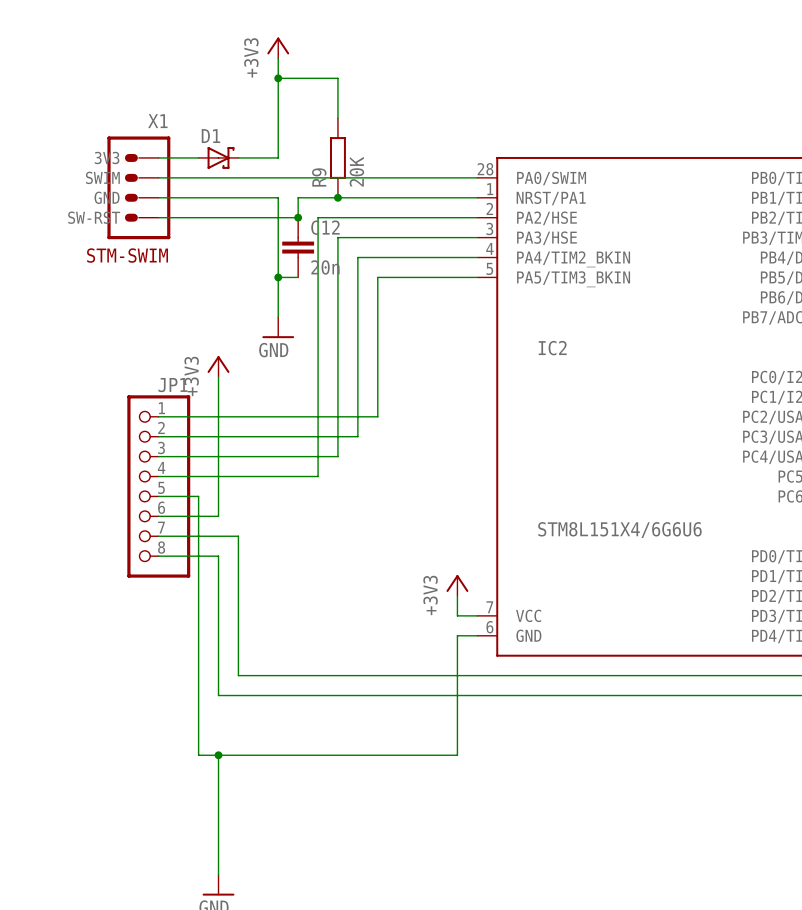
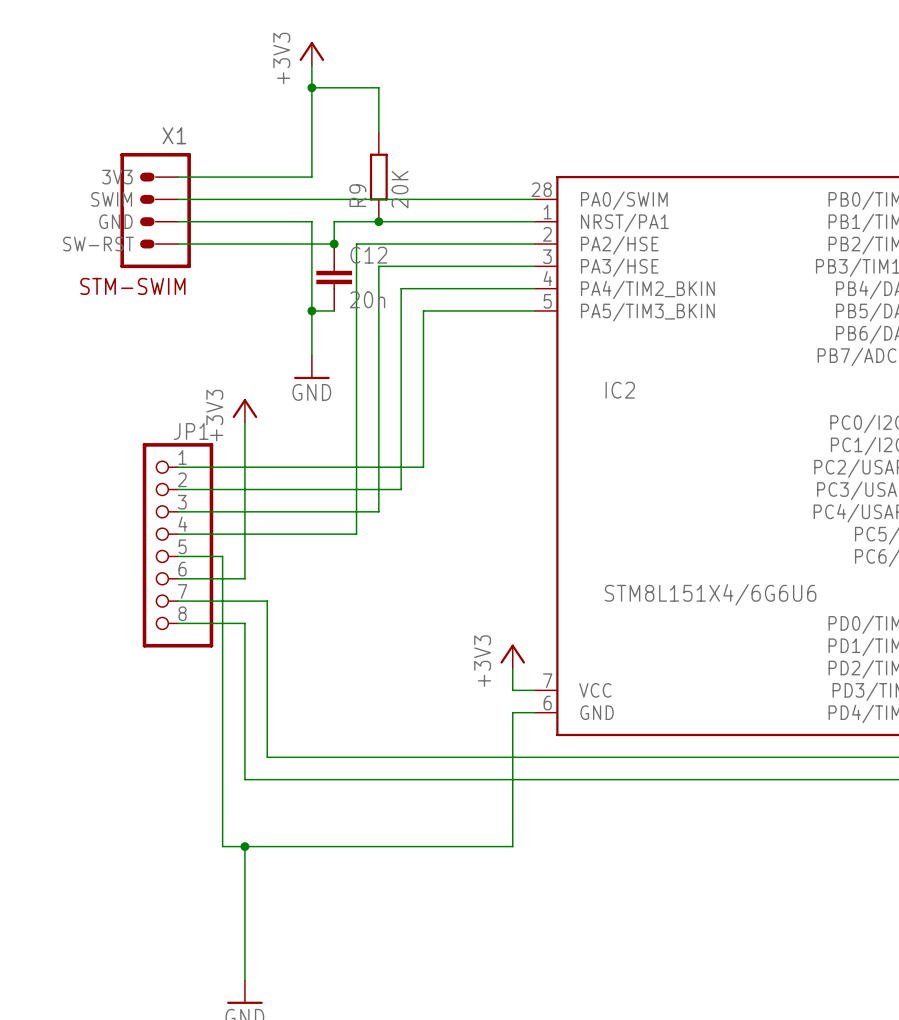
D1: (218, 157) -> none

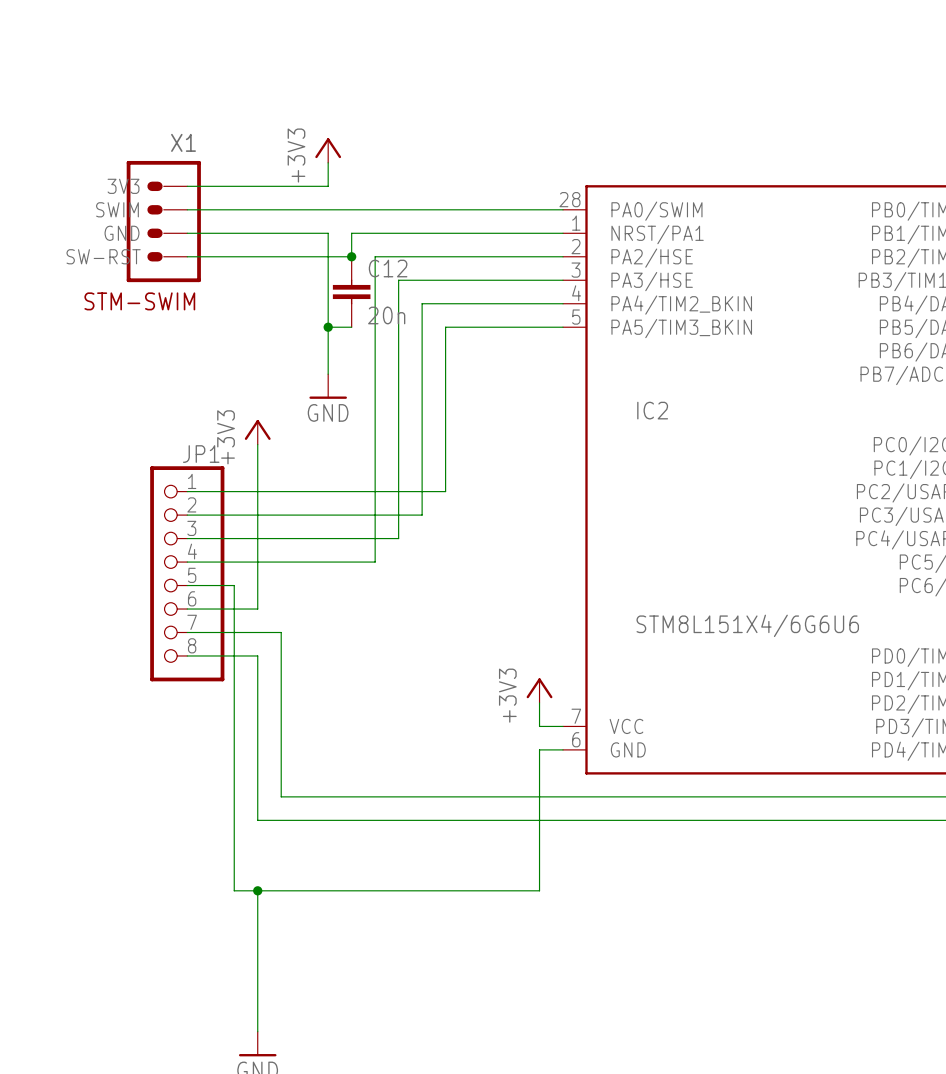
power symbol position: +3V3 (311, 53) -> +3V3 (328, 150)
wire: (311, 65) (311, 154) -> none
wire: (311, 87) (378, 87) (378, 132) -> none
junction: (311, 87) -> none
R9: 20K (378, 177) -> none
junction: (378, 221) -> none

